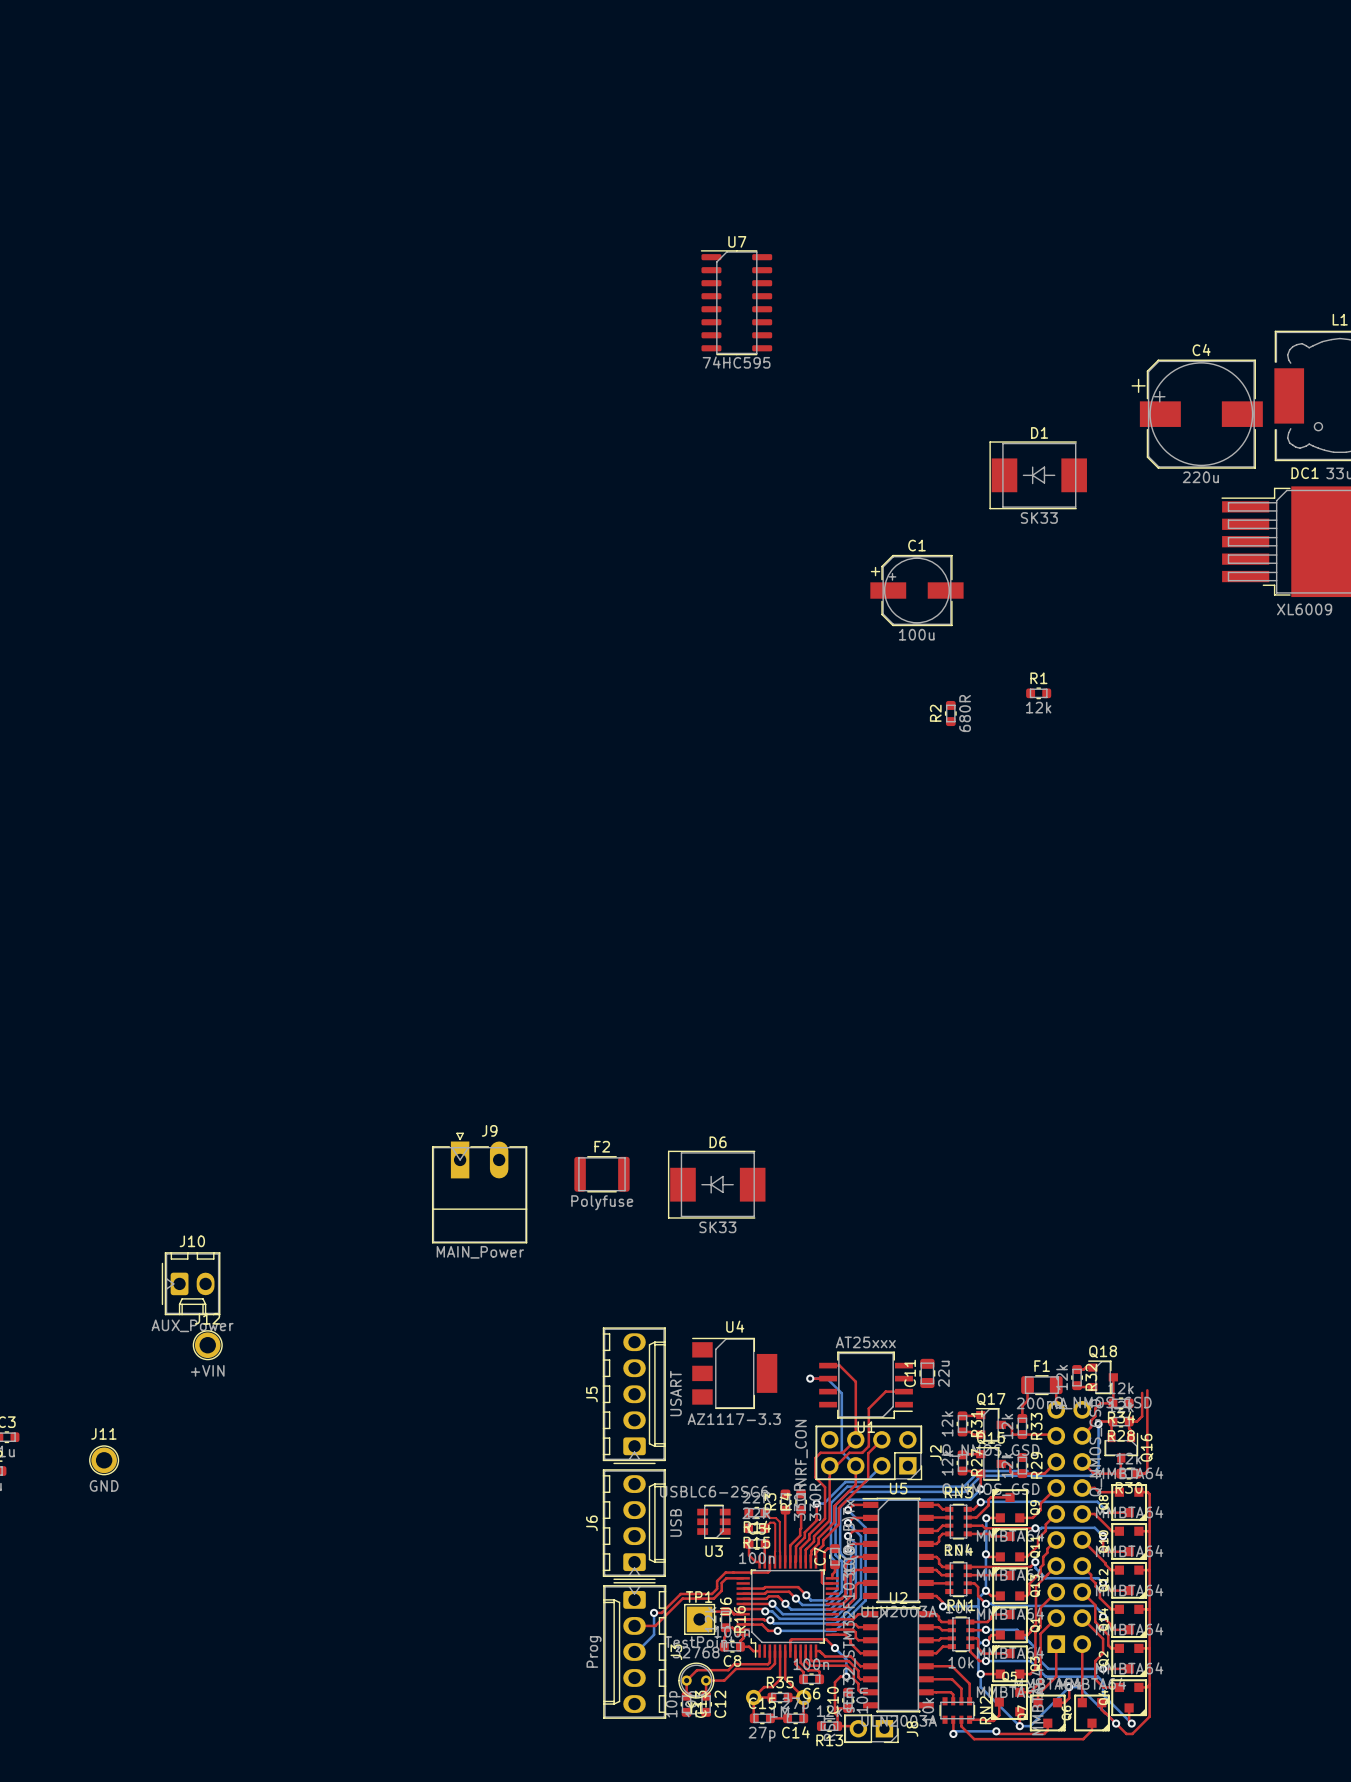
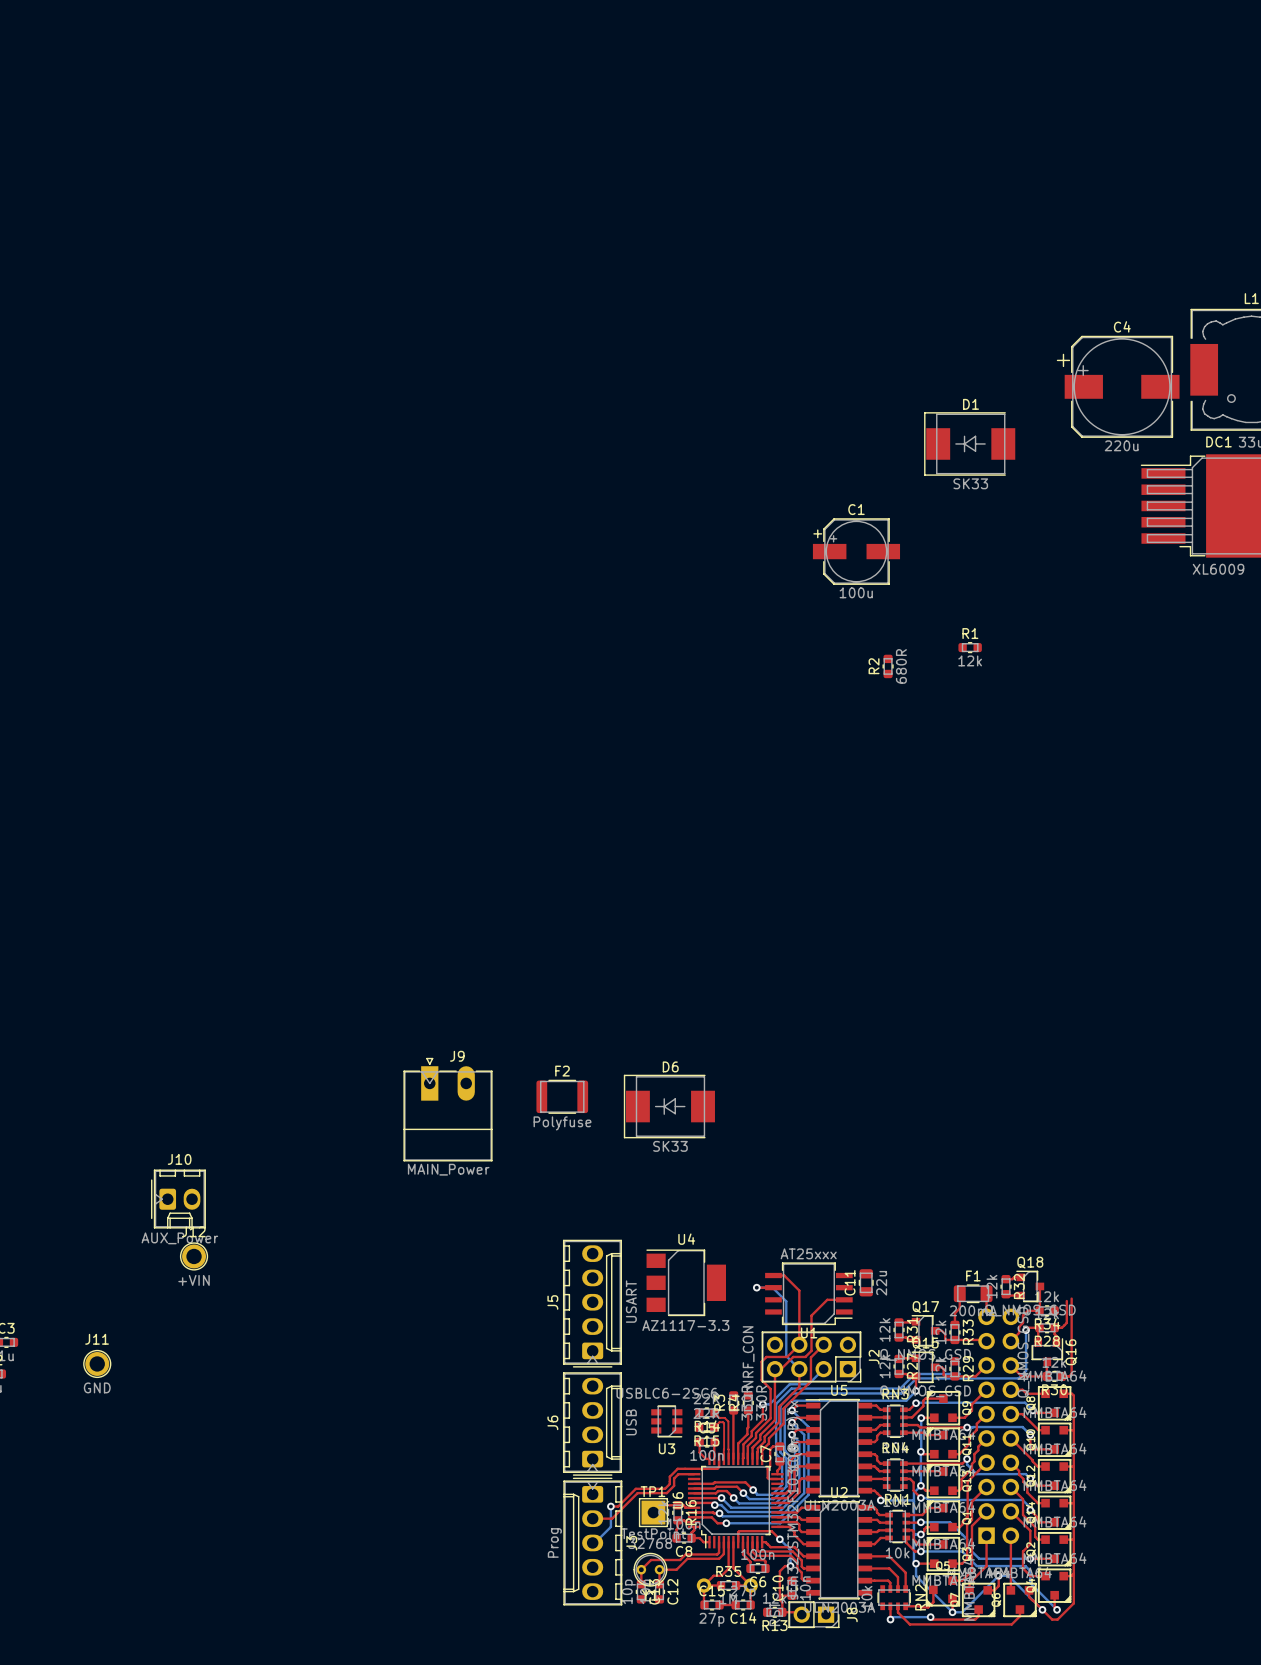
U7: 74HC595 (736, 302) -> none

